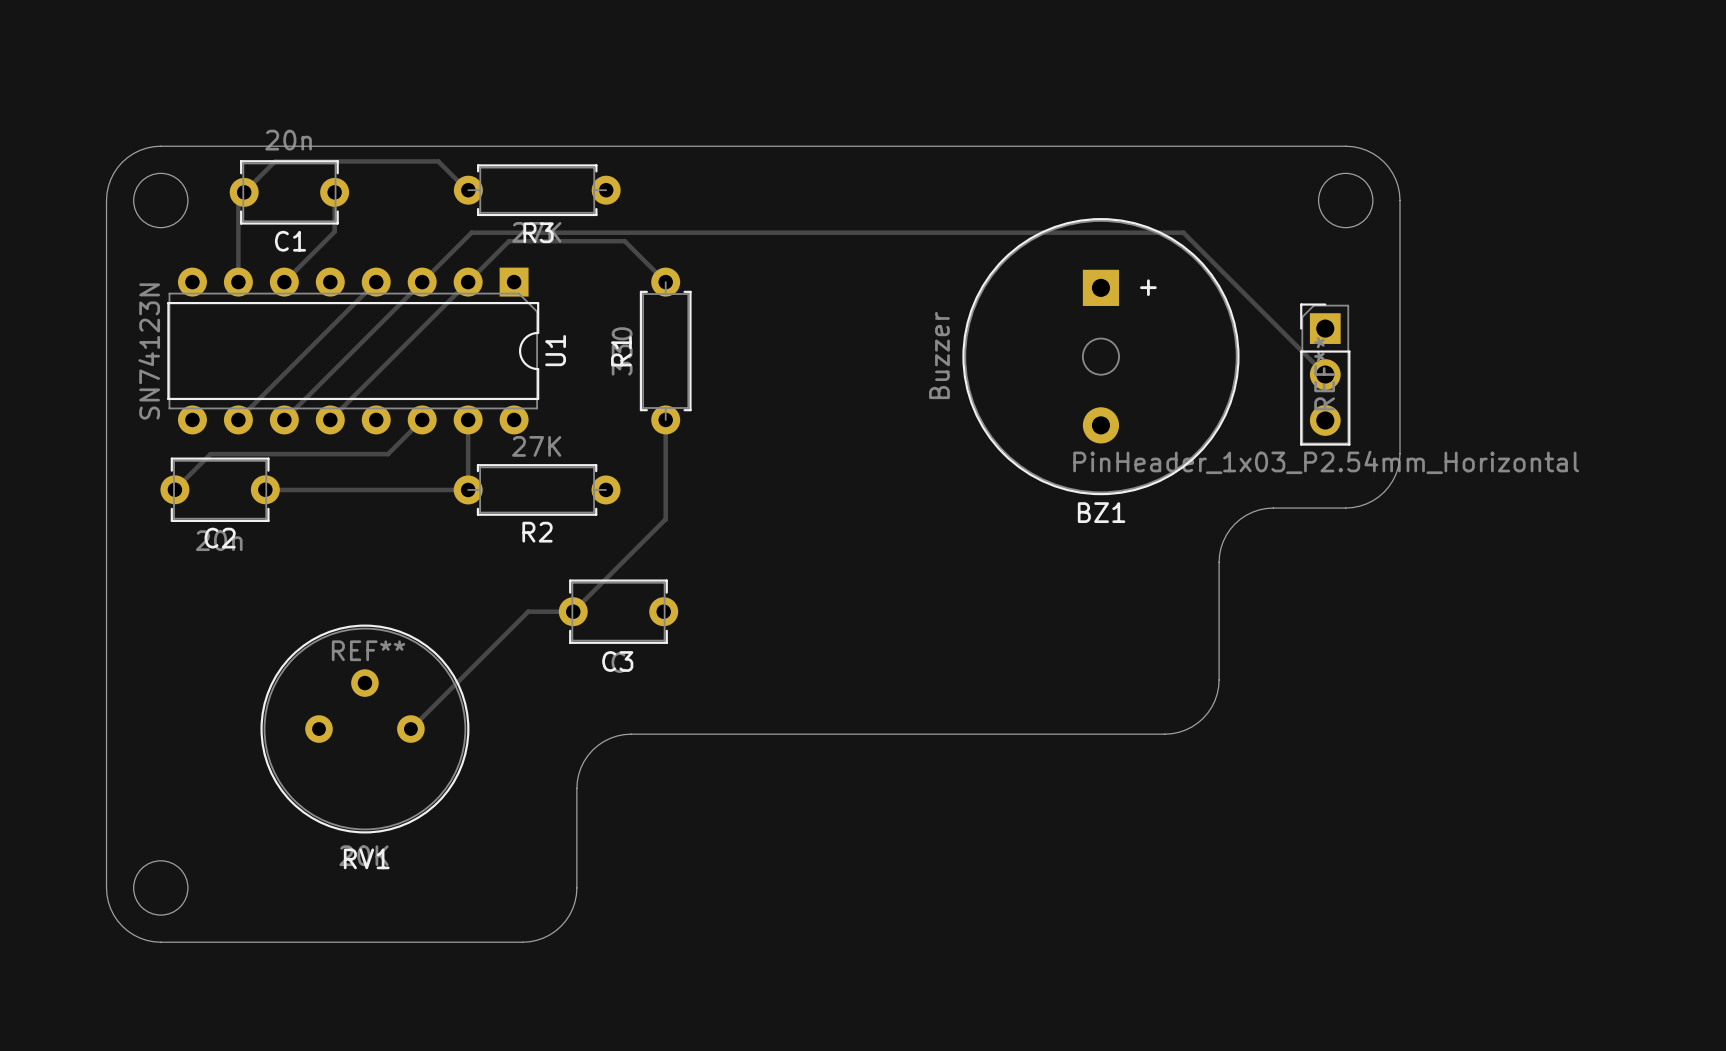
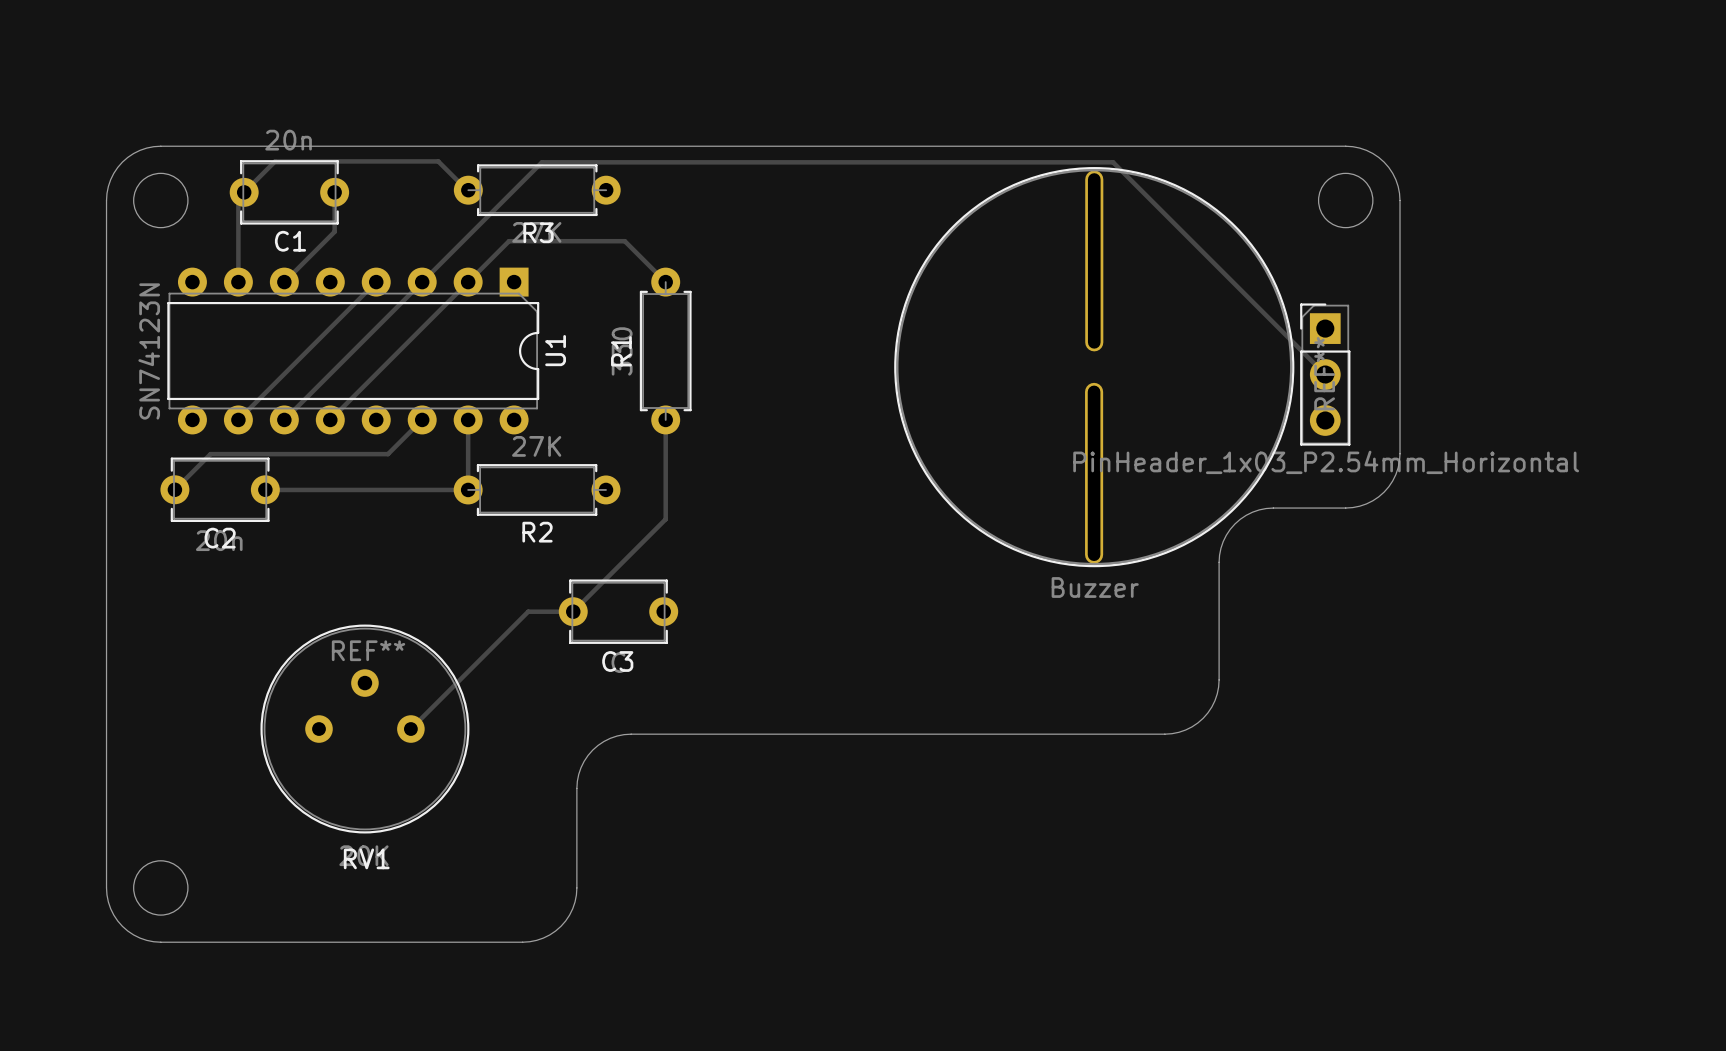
track: (471, 232) (1183, 232) -> (471, 232) (541, 162) (1113, 162) (1183, 232)
BZ1: Buzzer (1100, 356) -> none
part: none -> Buzzer (1094, 367)

